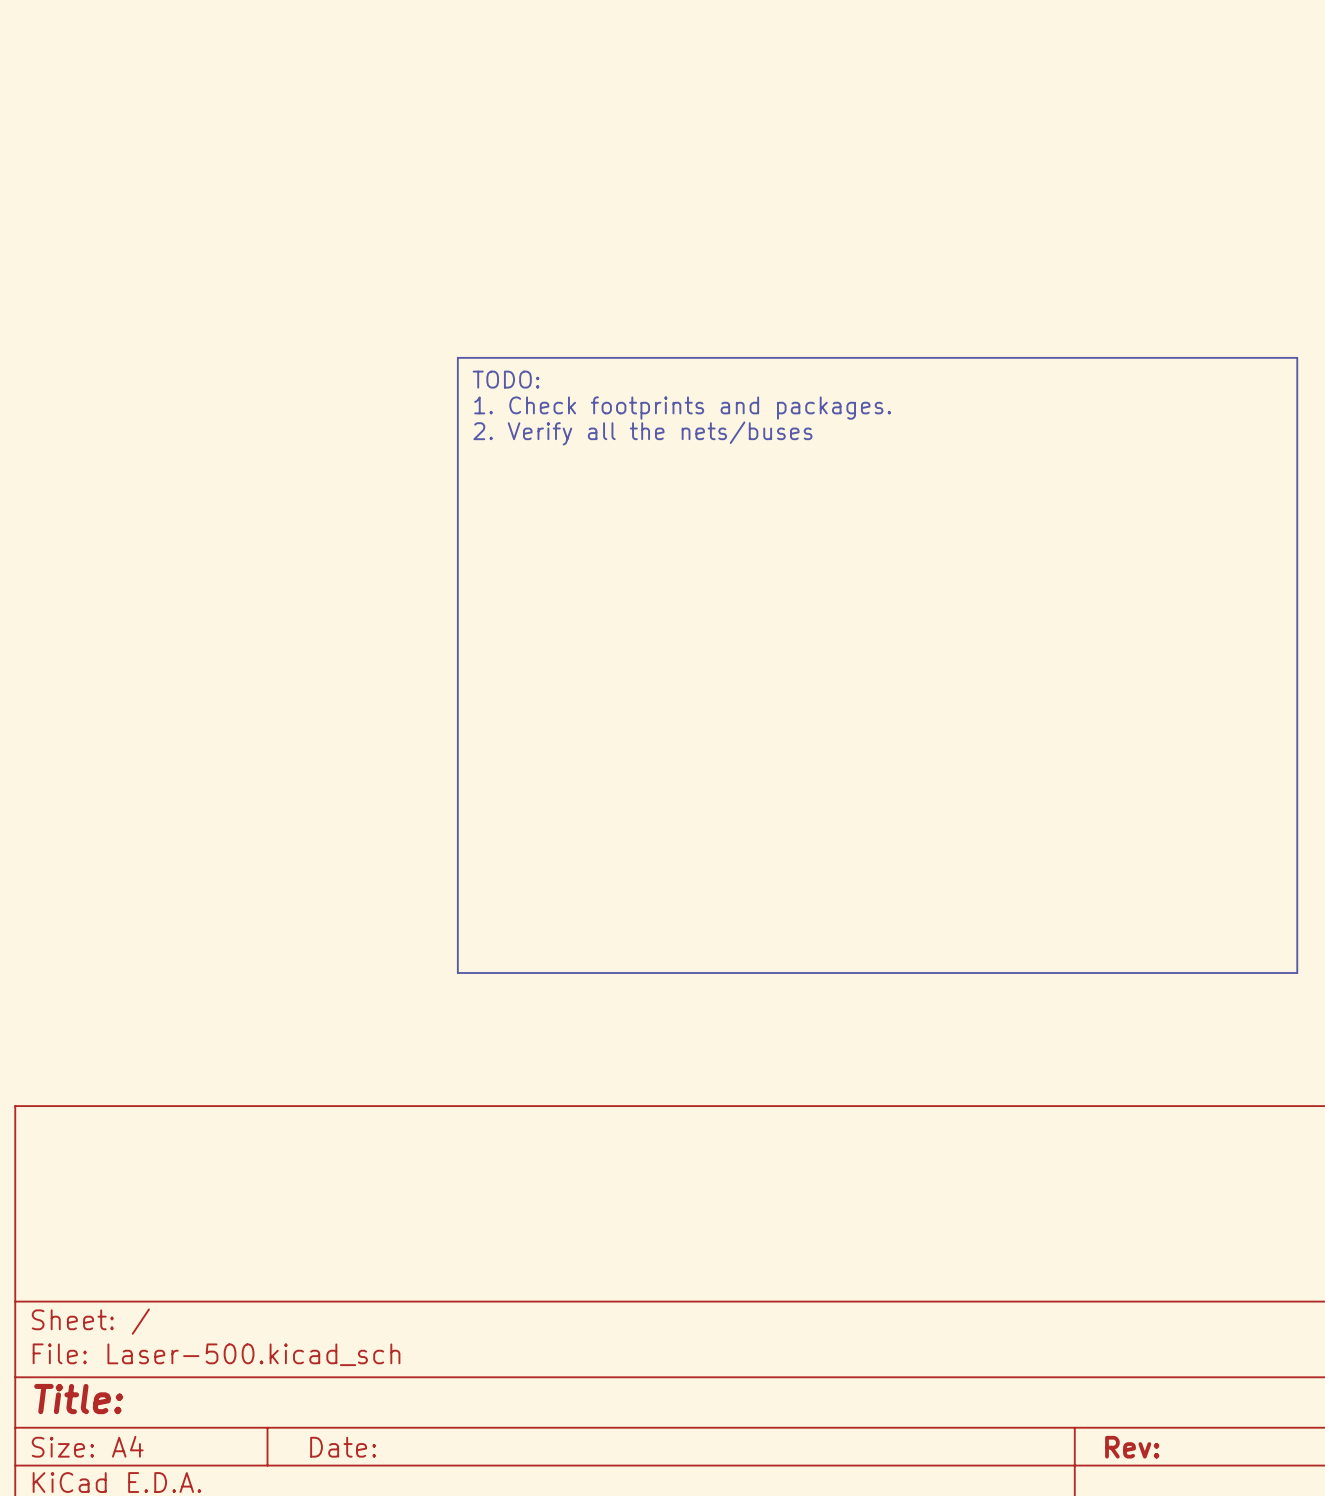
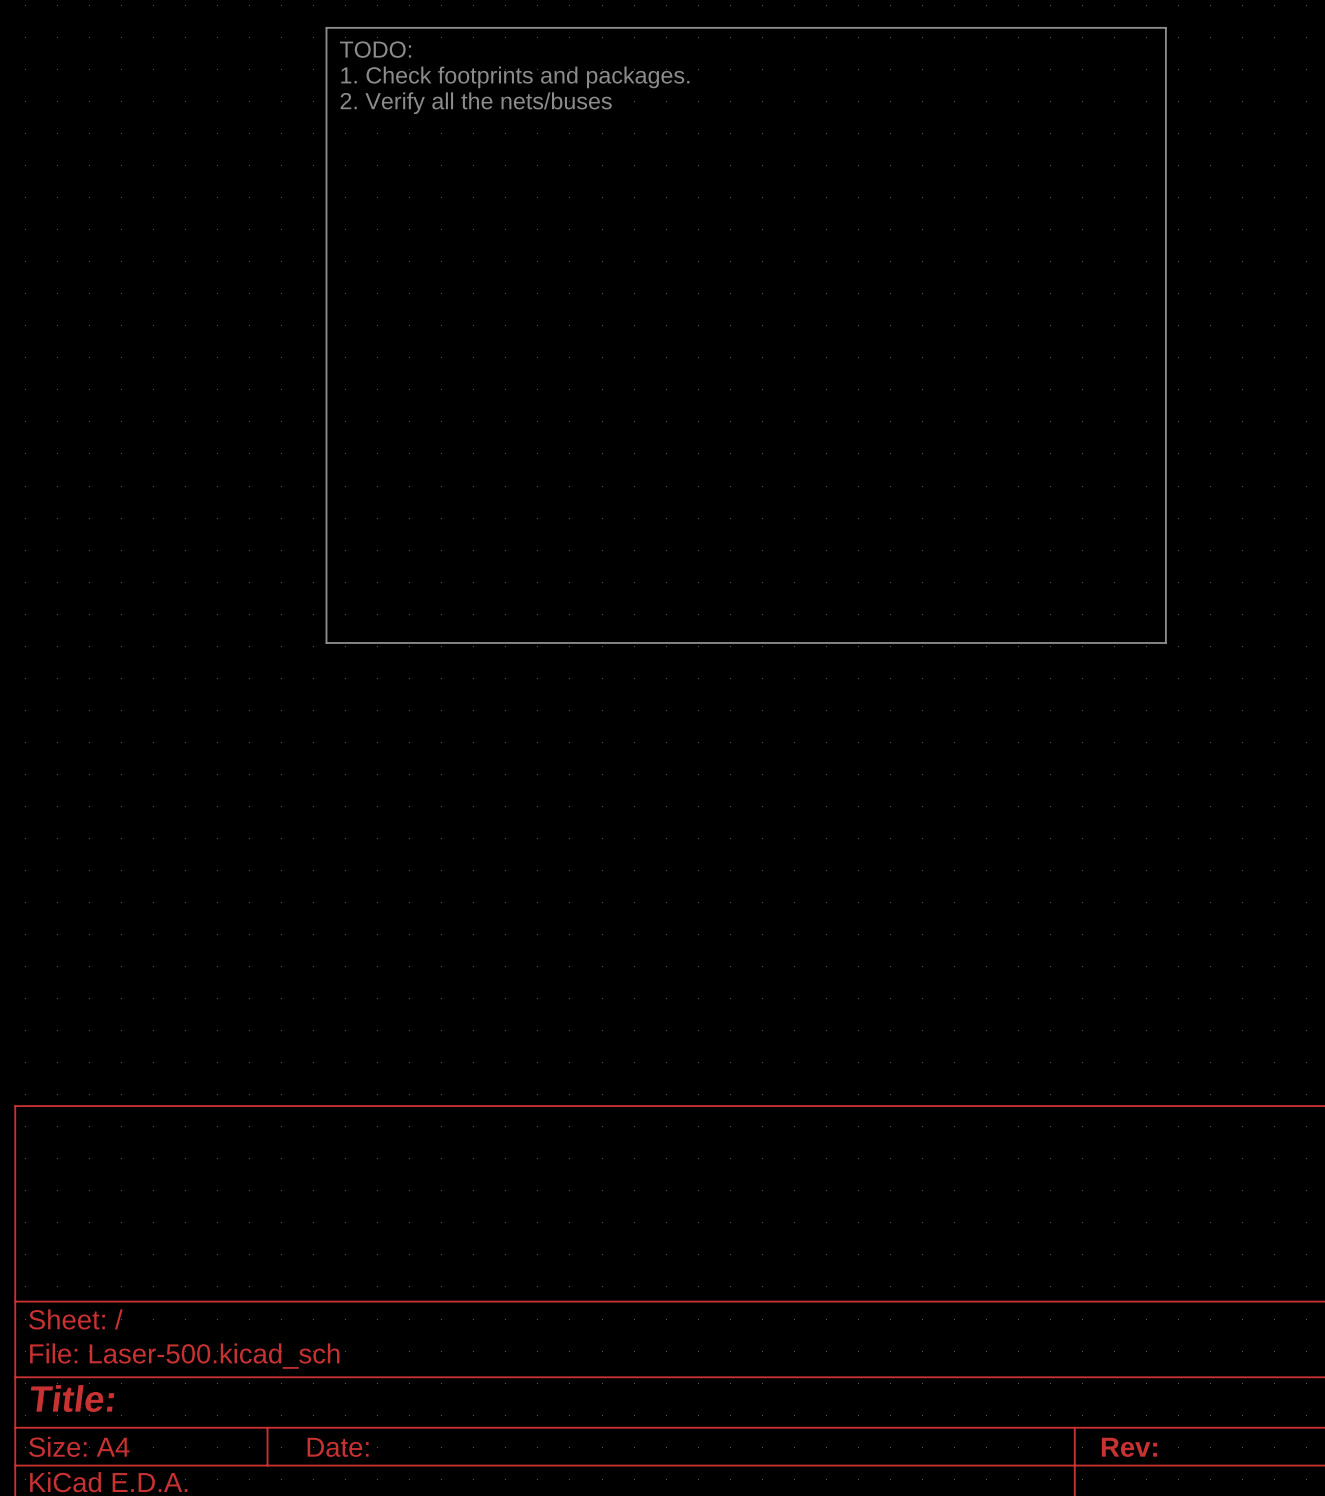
line: none -> (326, 27) (1165, 27) (1165, 642) (326, 642) (326, 27)
text: none -> TODO: (375, 49)
text: none -> 1. Check footprints and packages. (515, 77)
text: none -> 2. Verify all the nets/buses (476, 103)
line: (457, 357) (1297, 357) (1297, 972) (457, 972) (457, 357) -> none
text: TODO: (506, 379) -> none
text: 1. Check footprints and packages. (682, 408) -> none
text: 2. Verify all the nets/buses (642, 433) -> none

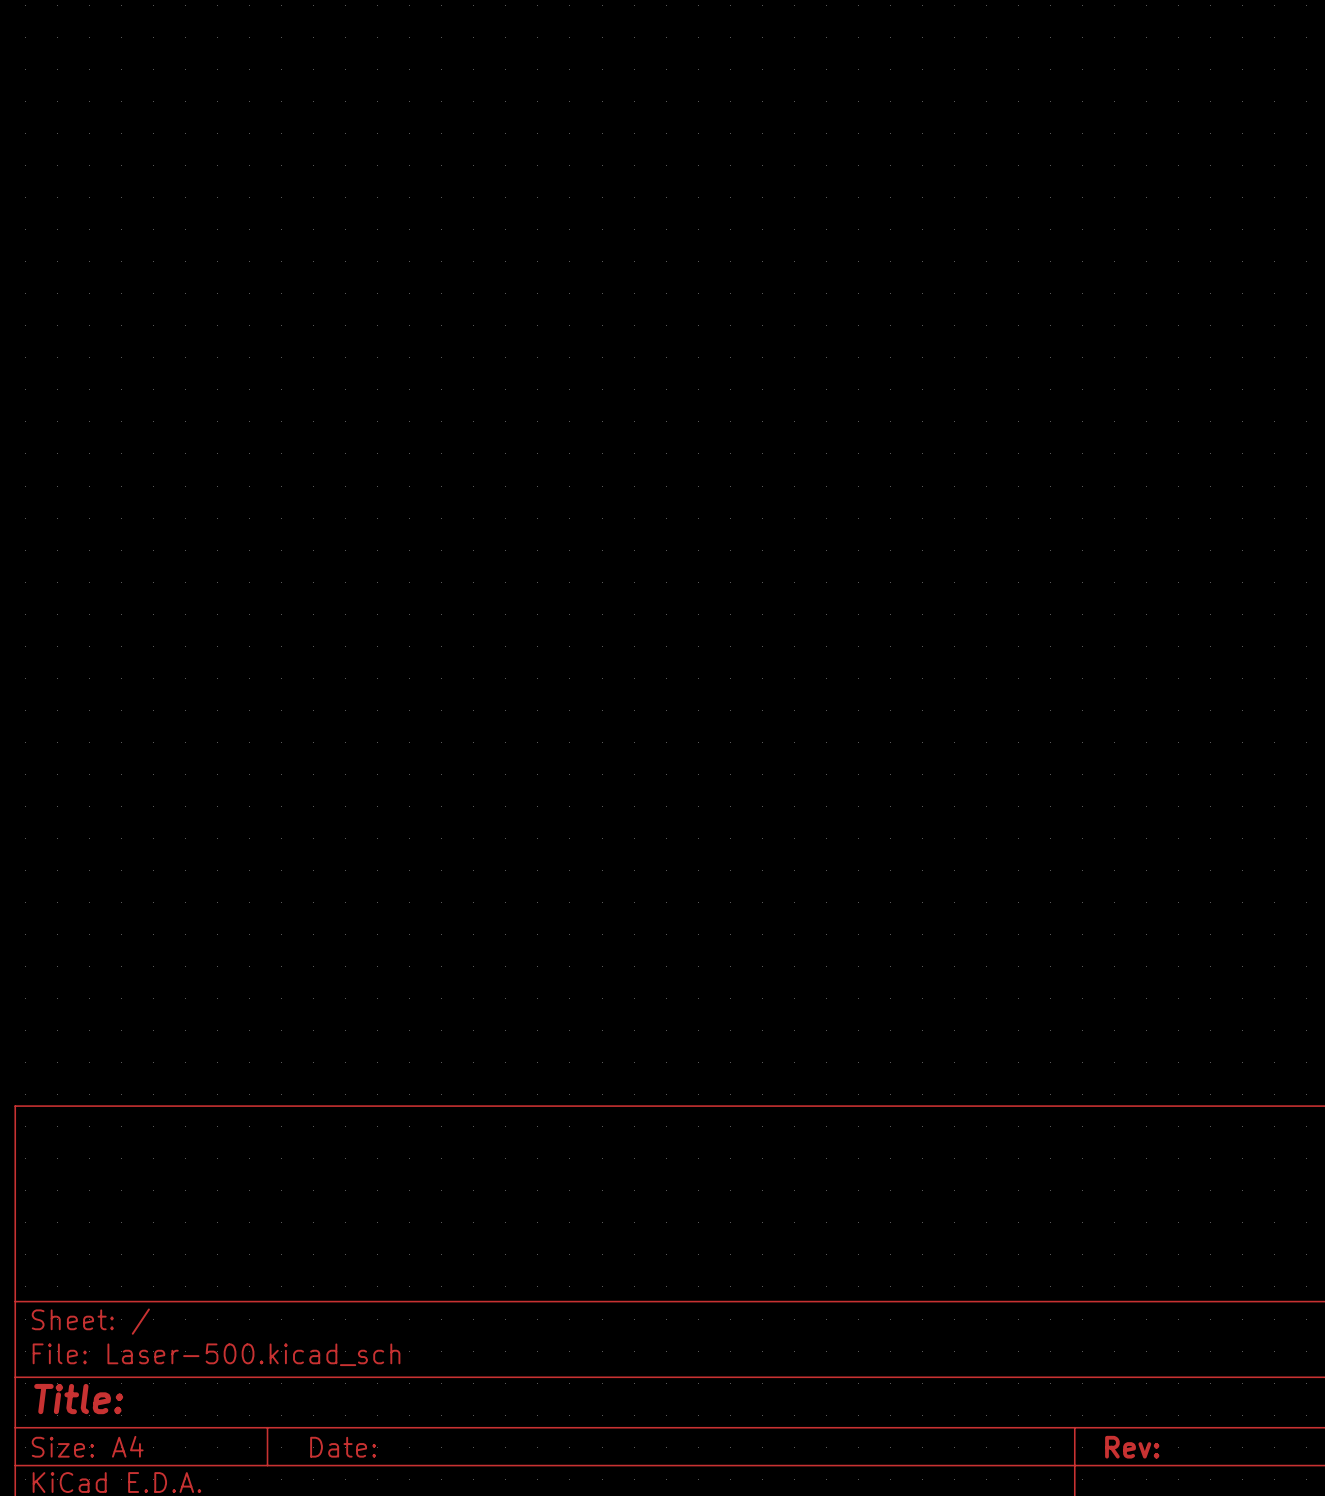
line: (326, 27) (1165, 27) (1165, 642) (326, 642) (326, 27) -> none
text: TODO: (375, 49) -> none
text: 1. Check footprints and packages. (515, 77) -> none
text: 2. Verify all the nets/buses (476, 103) -> none

